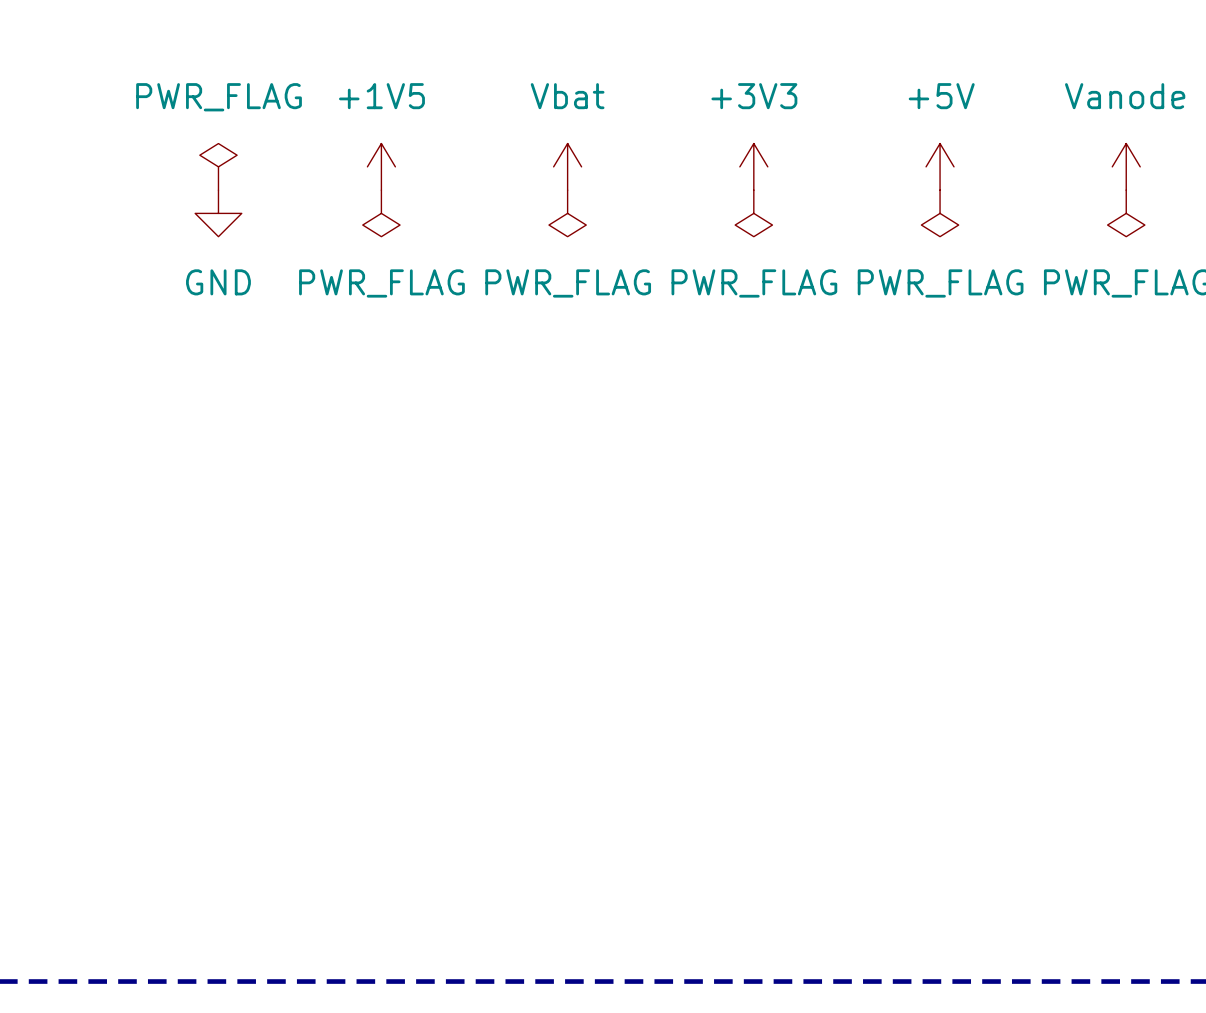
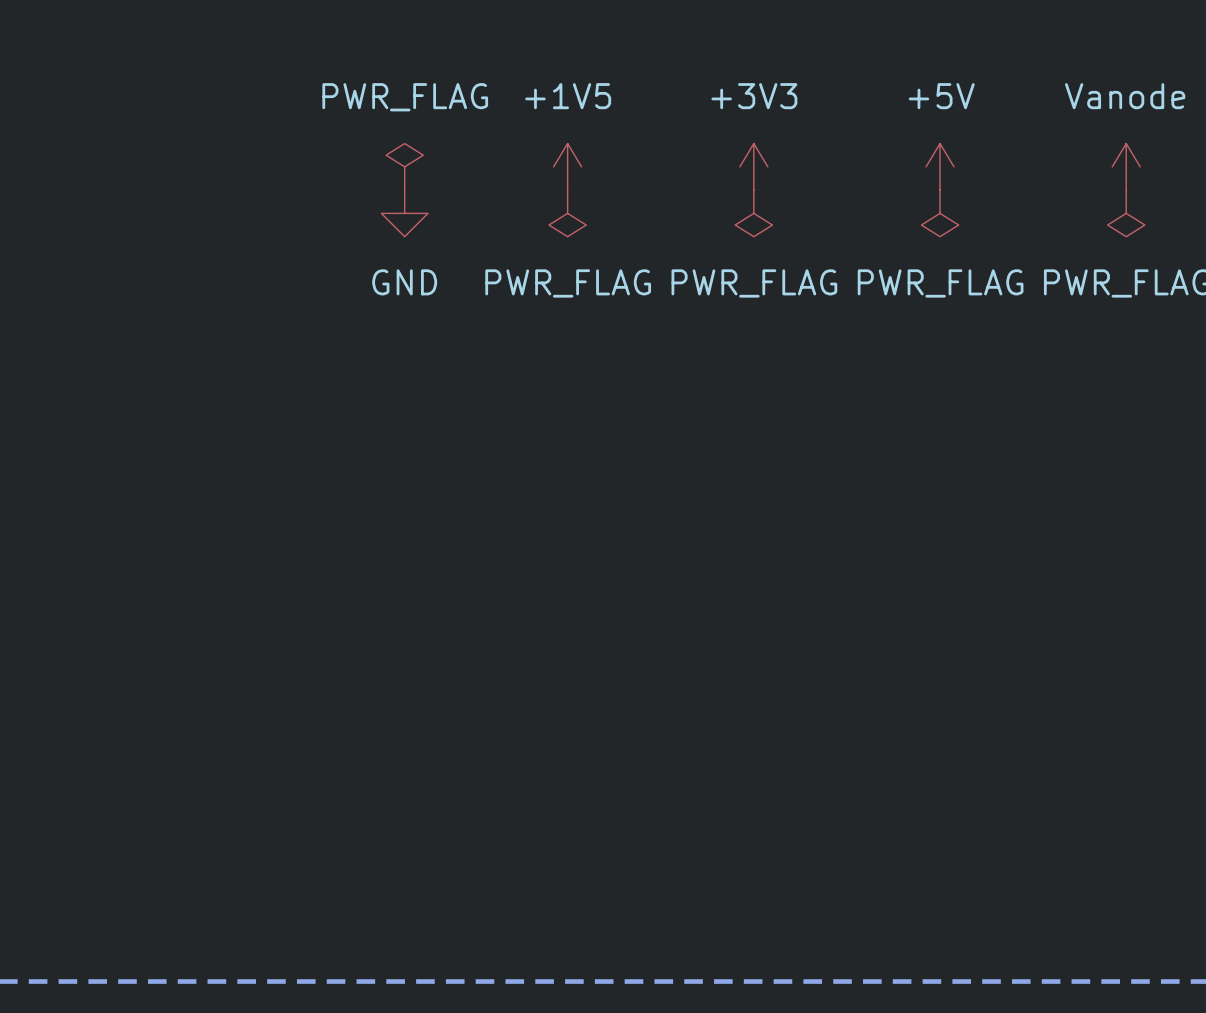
power symbol: PWR_FLAG (218, 166) -> none
power symbol: +1V5 (381, 166) -> none
power symbol: Vbat (567, 166) -> +1V5 (567, 166)
power symbol position: GND (218, 213) -> GND (404, 213)
power symbol rotation: 0° (381, 213) -> 180° (404, 166)
power symbol position: PWR_FLAG (381, 213) -> PWR_FLAG (404, 166)

